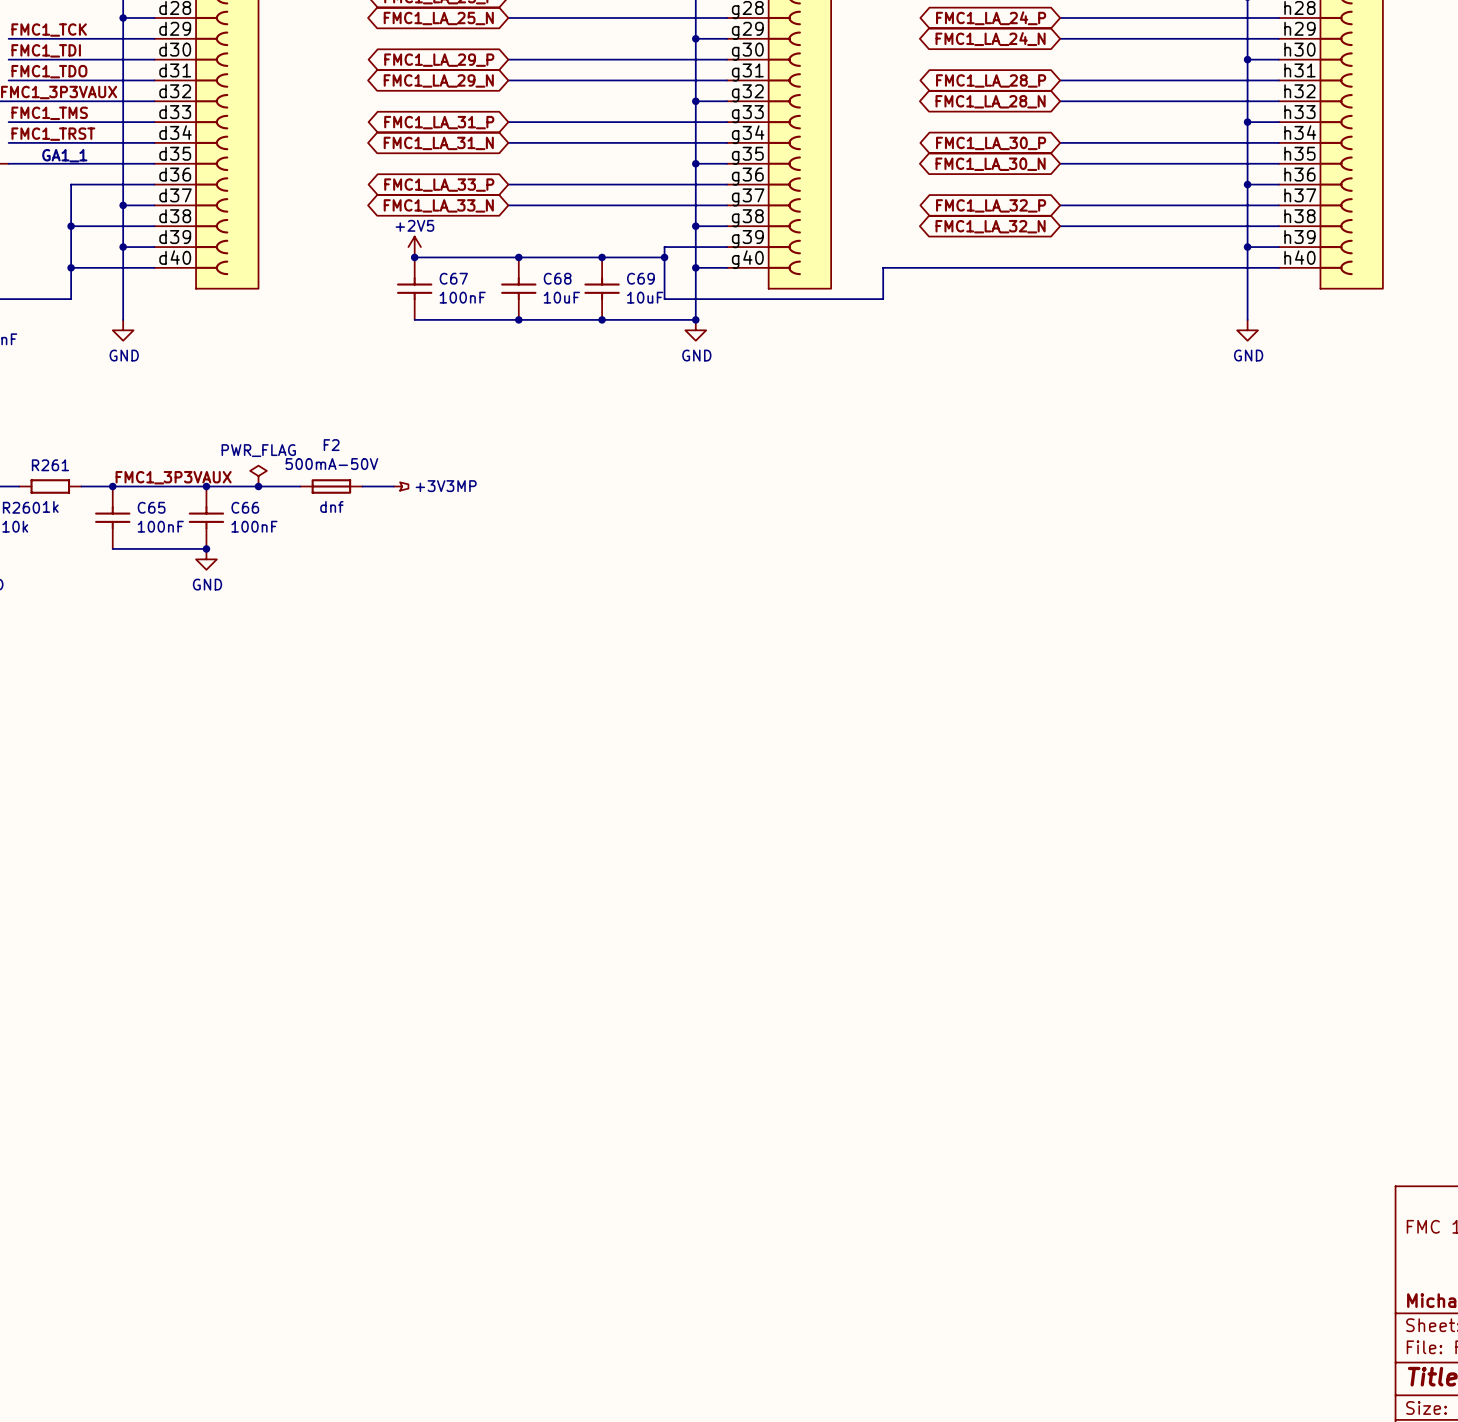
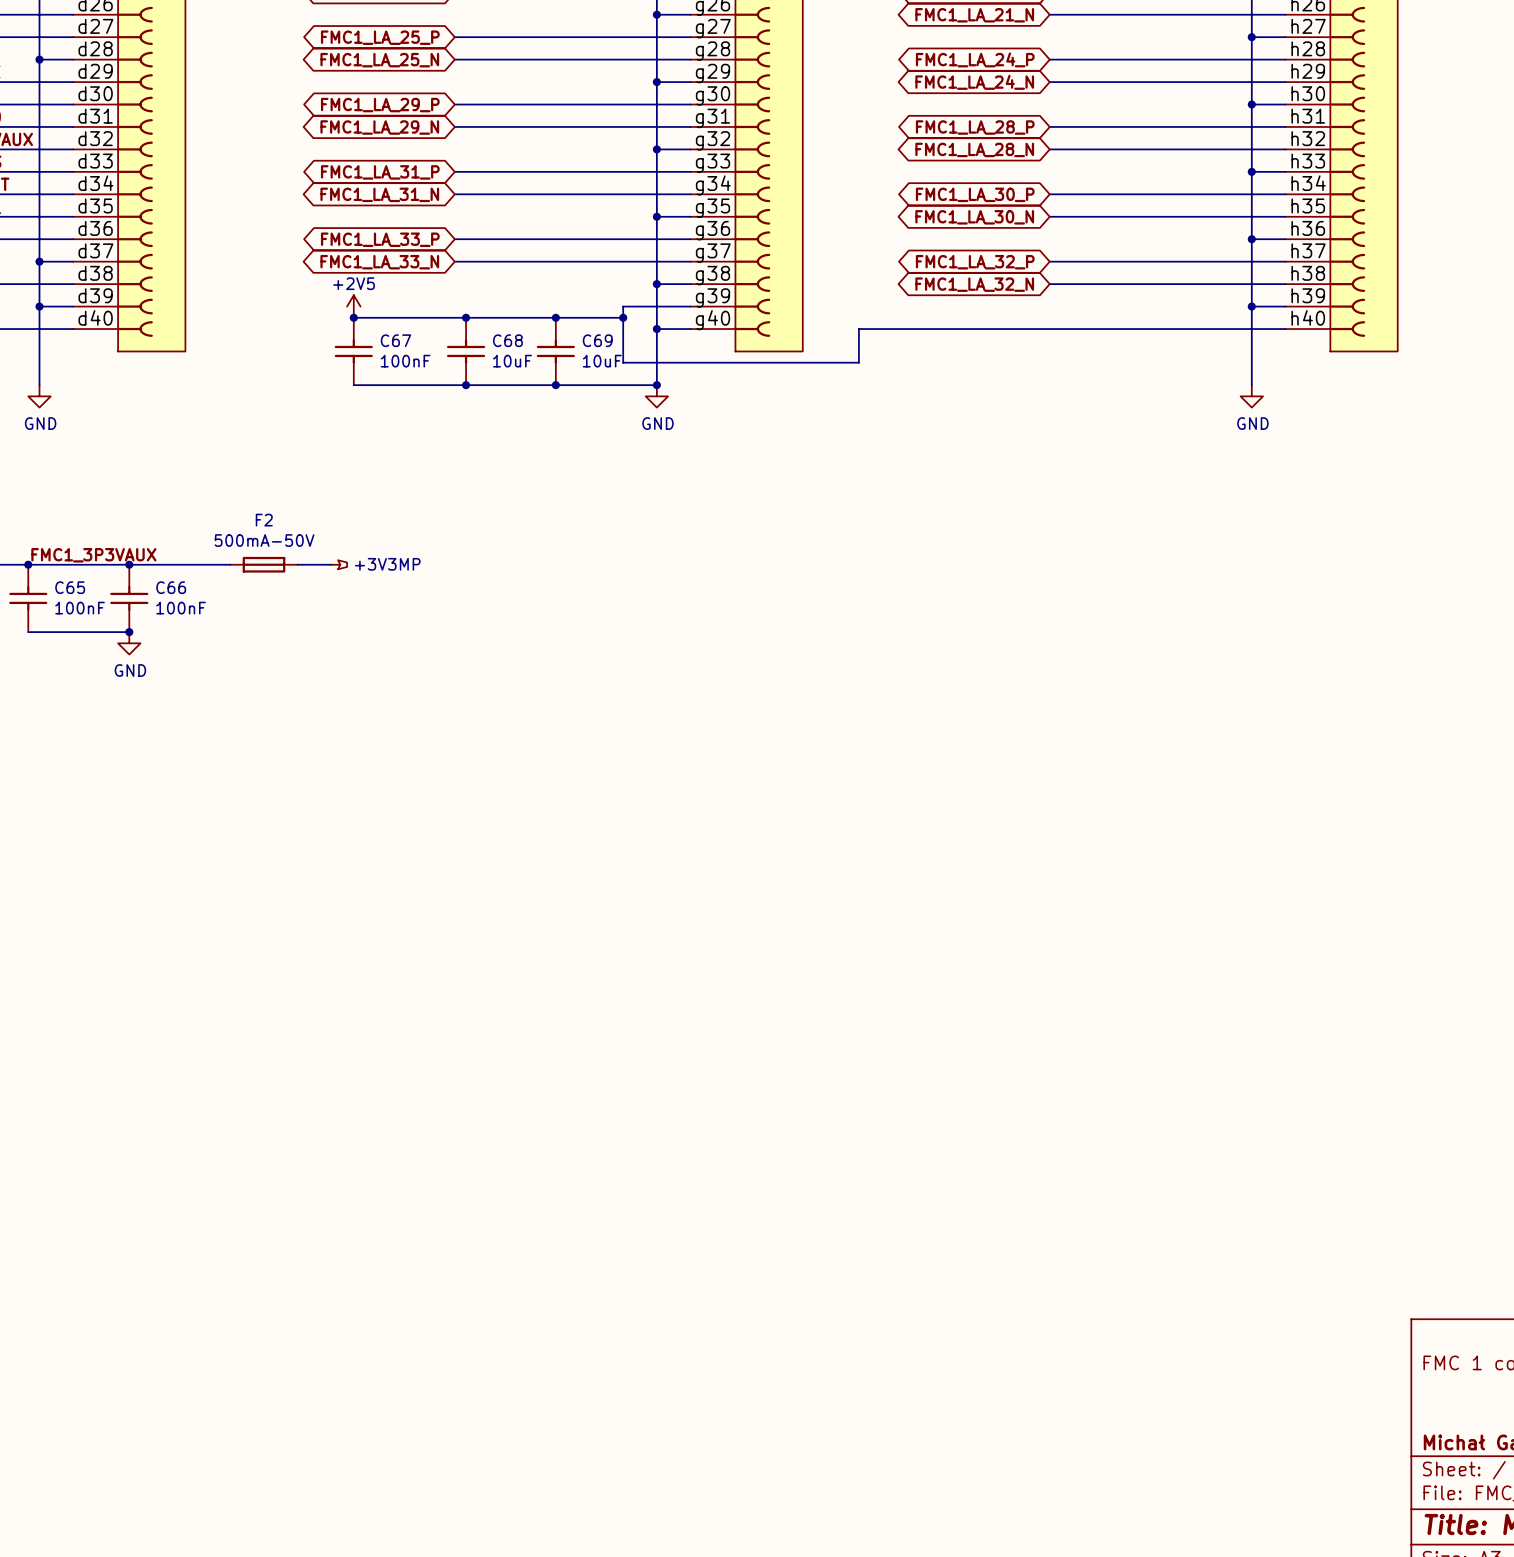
power symbol: PWR_FLAG (258, 476) -> none
junction: (258, 486) -> none
F2 text: dnf (331, 506) -> none

